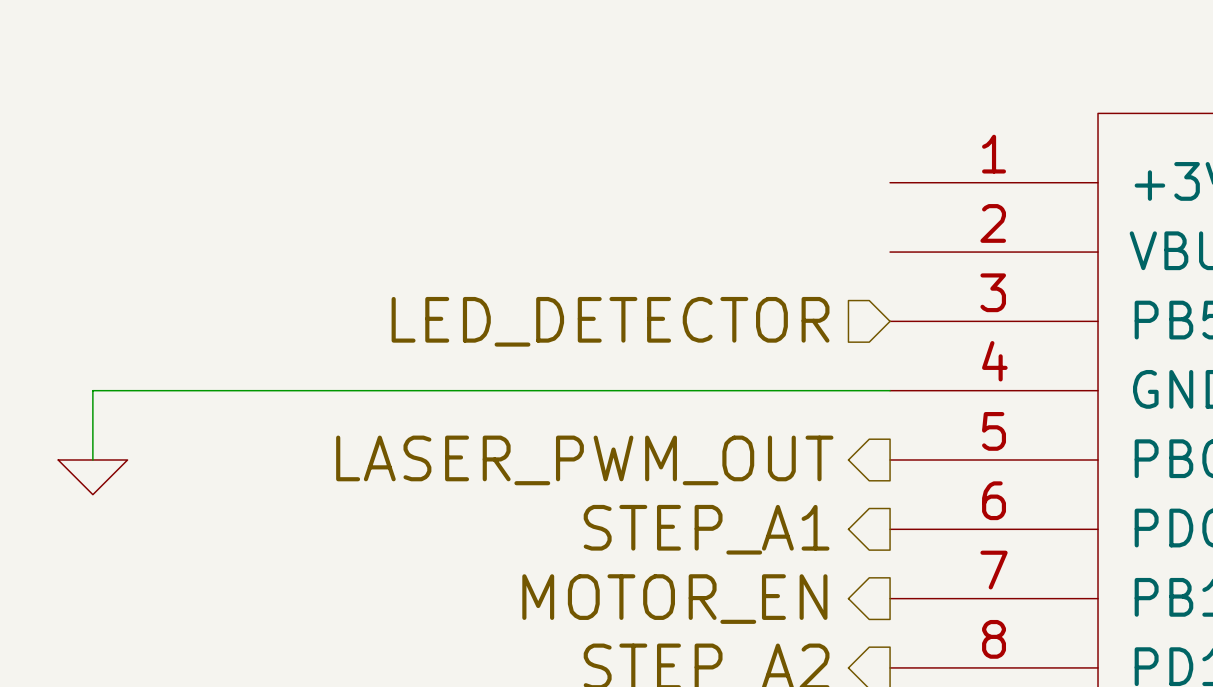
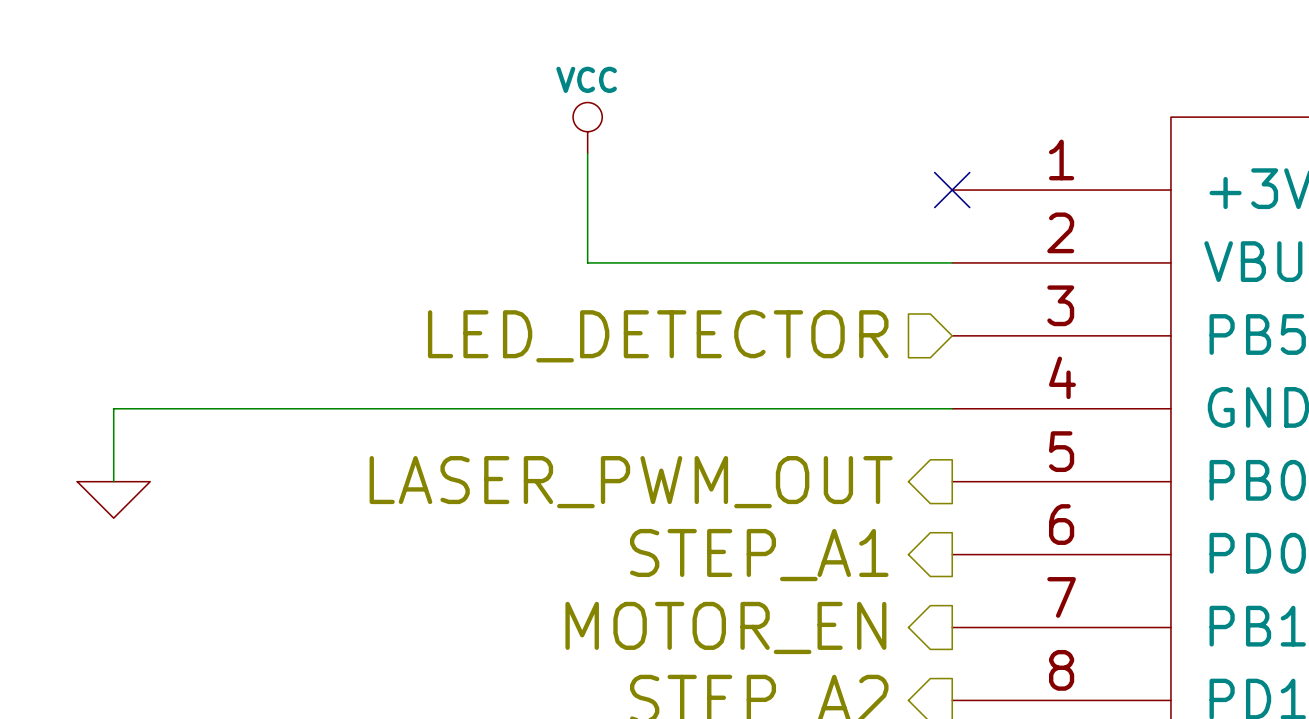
power symbol: none -> VCC (587, 128)
wire: none -> (587, 153) (587, 262) (952, 262)
no-connect mark: none -> (952, 190)

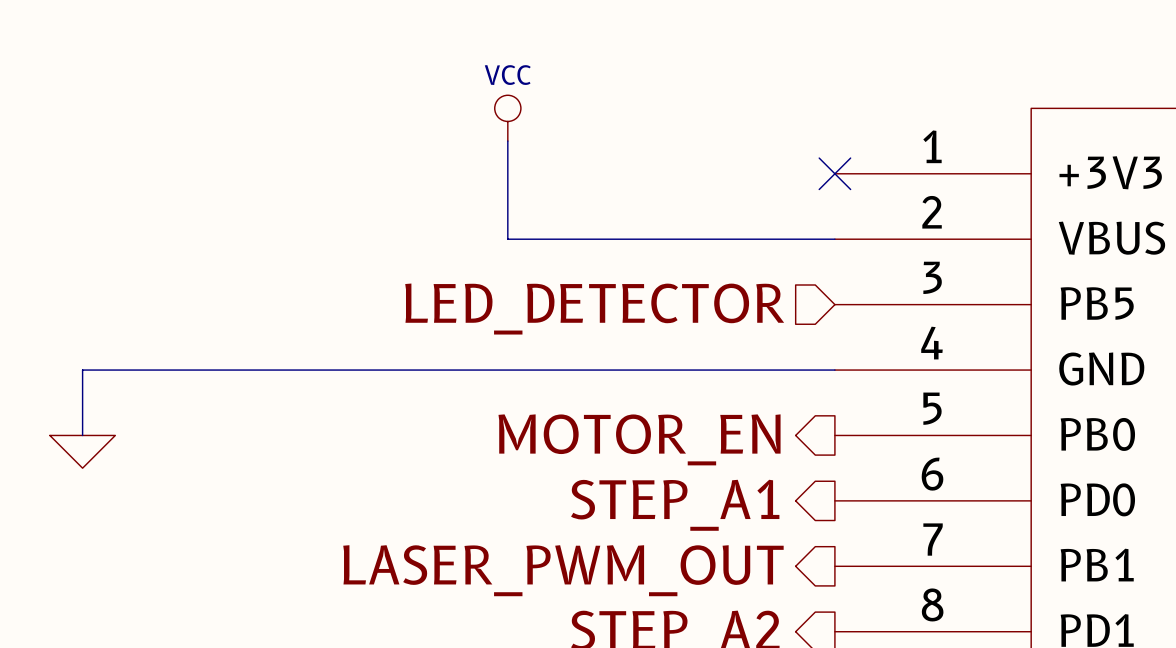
hierarchical label: LASER_PWM_OUT (631, 482) -> MOTOR_EN (639, 439)
hierarchical label: MOTOR_EN (725, 627) -> LASER_PWM_OUT (563, 570)

